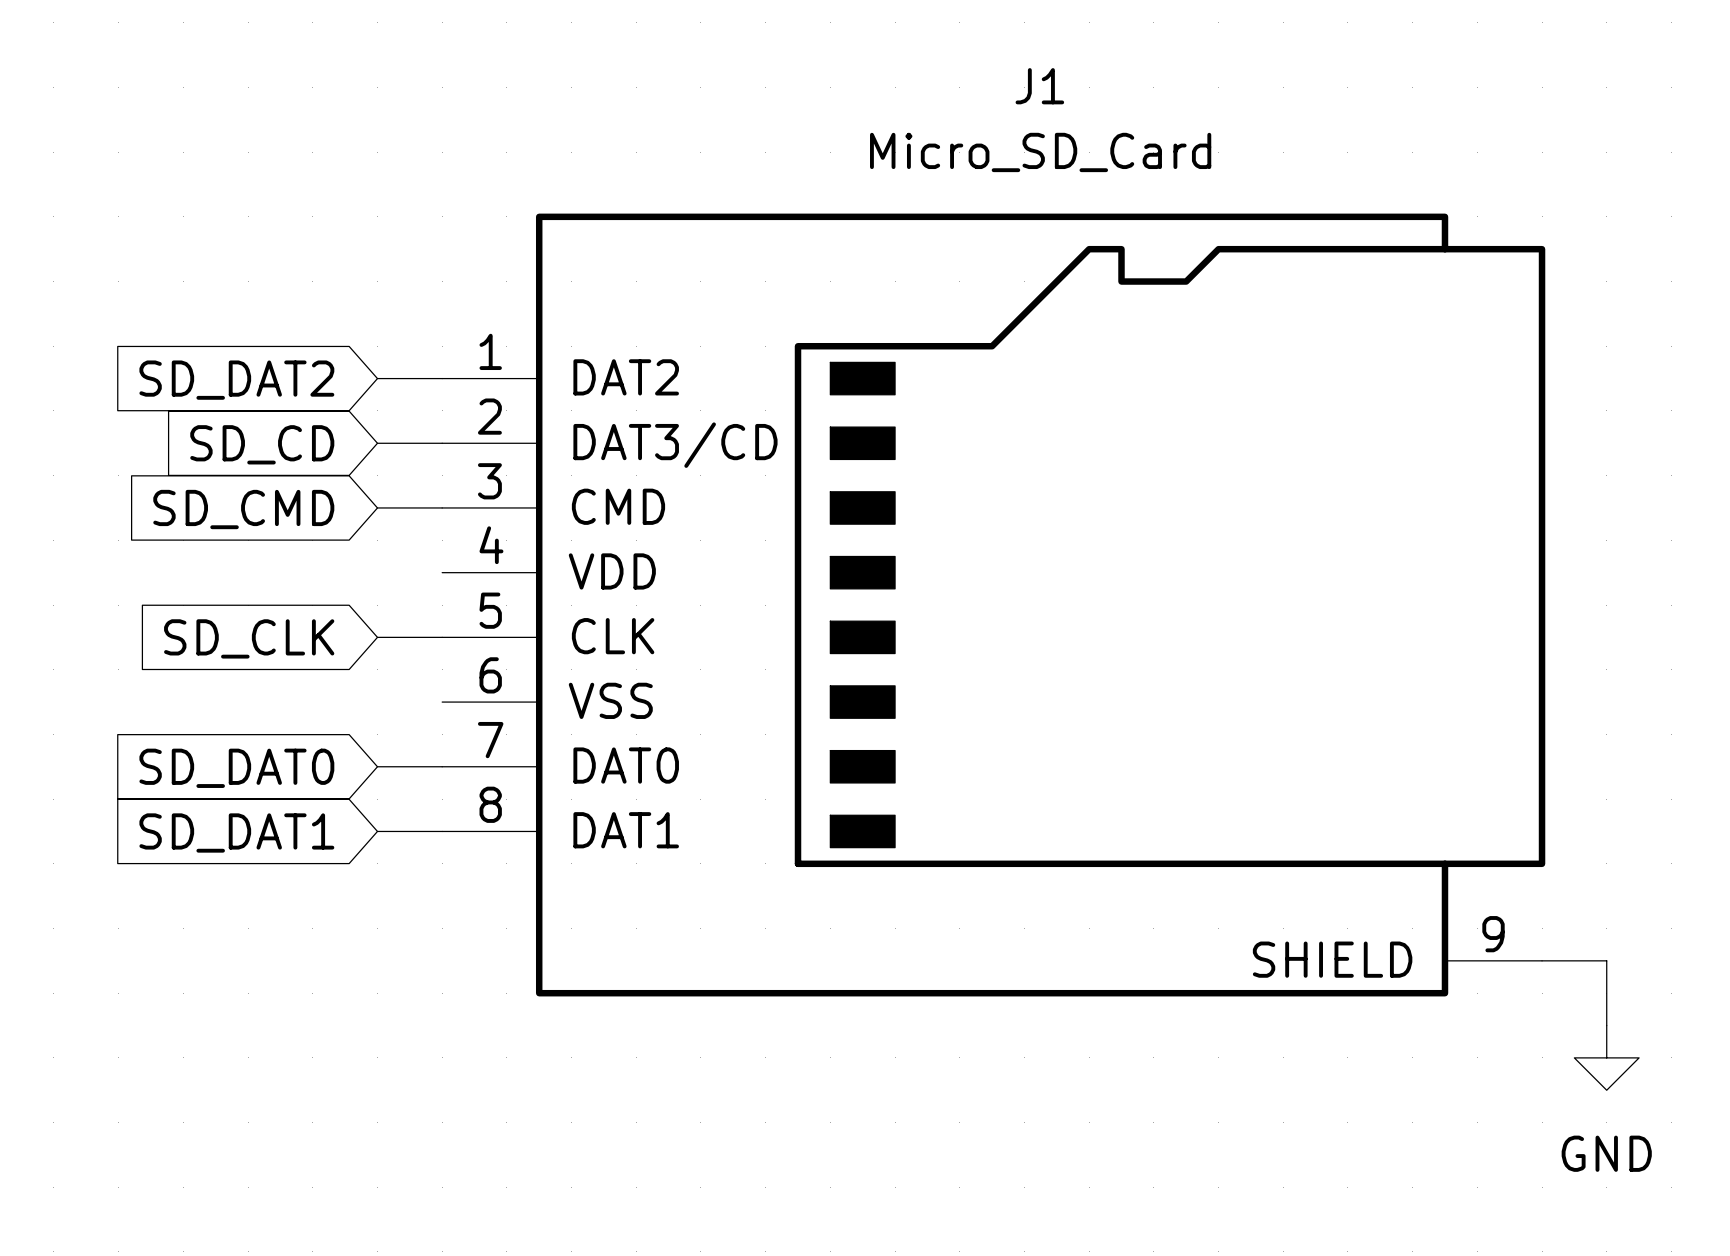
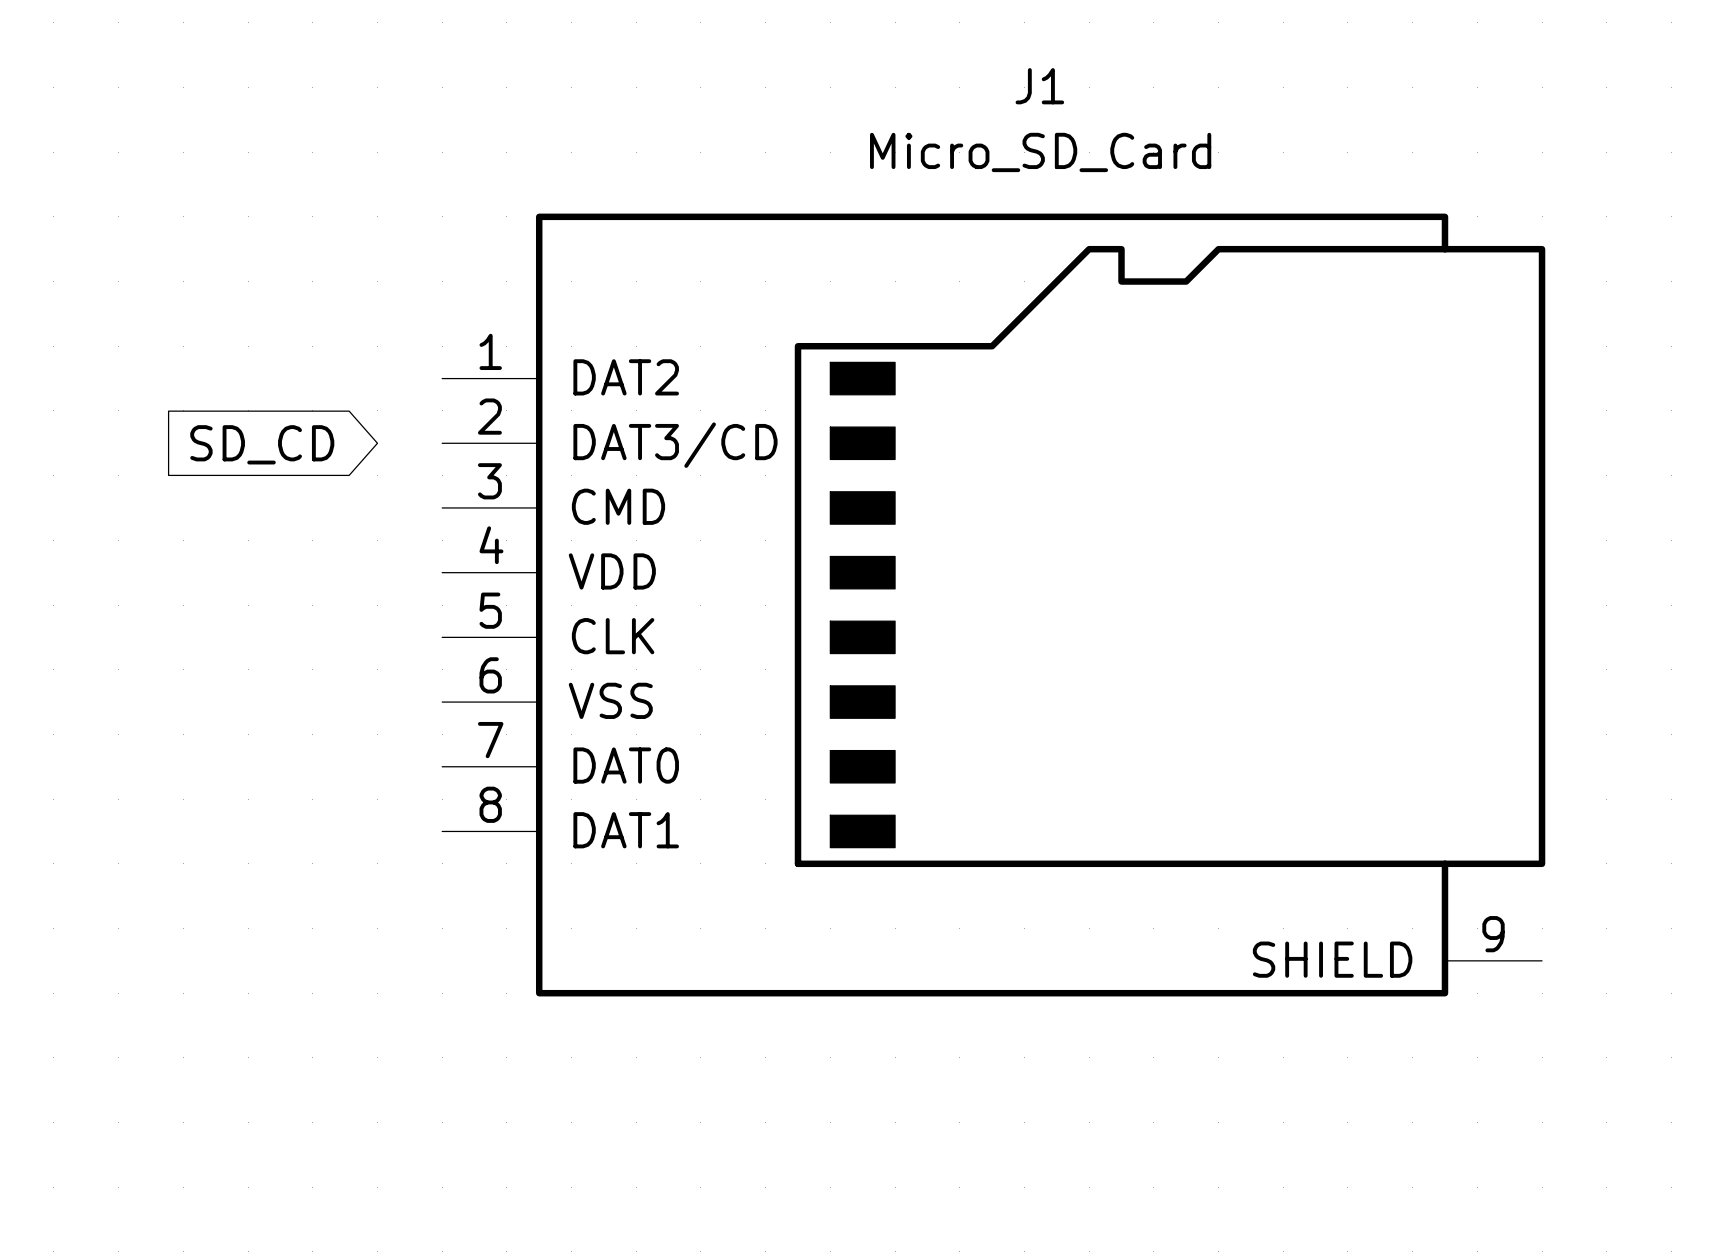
wire: (377, 378) (442, 378) -> none
global label: SD_DAT2 (236, 380) -> none
wire: (377, 443) (442, 443) -> none
wire: (377, 507) (442, 507) -> none
global label: SD_CMD (243, 509) -> none
wire: (377, 637) (442, 637) -> none
global label: SD_CLK (249, 638) -> none
wire: (377, 766) (442, 766) -> none
global label: SD_DAT0 (236, 768) -> none
wire: (377, 831) (442, 831) -> none
global label: SD_DAT1 (236, 833) -> none
wire: (1542, 960) (1606, 960) (1606, 1025) -> none
power symbol: GND (1606, 1057) -> none

